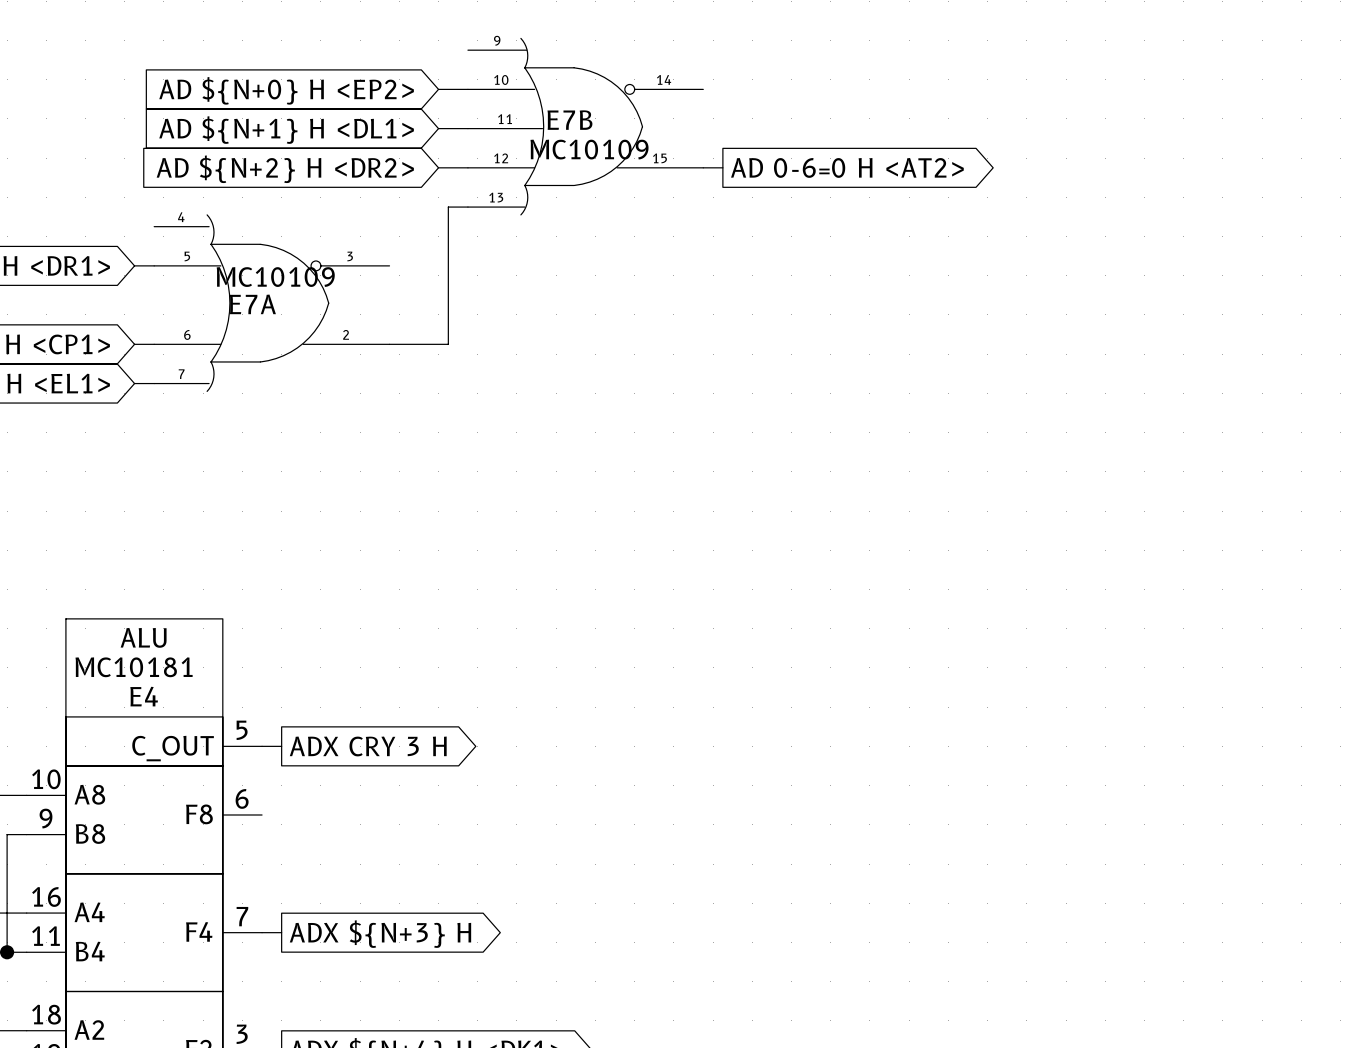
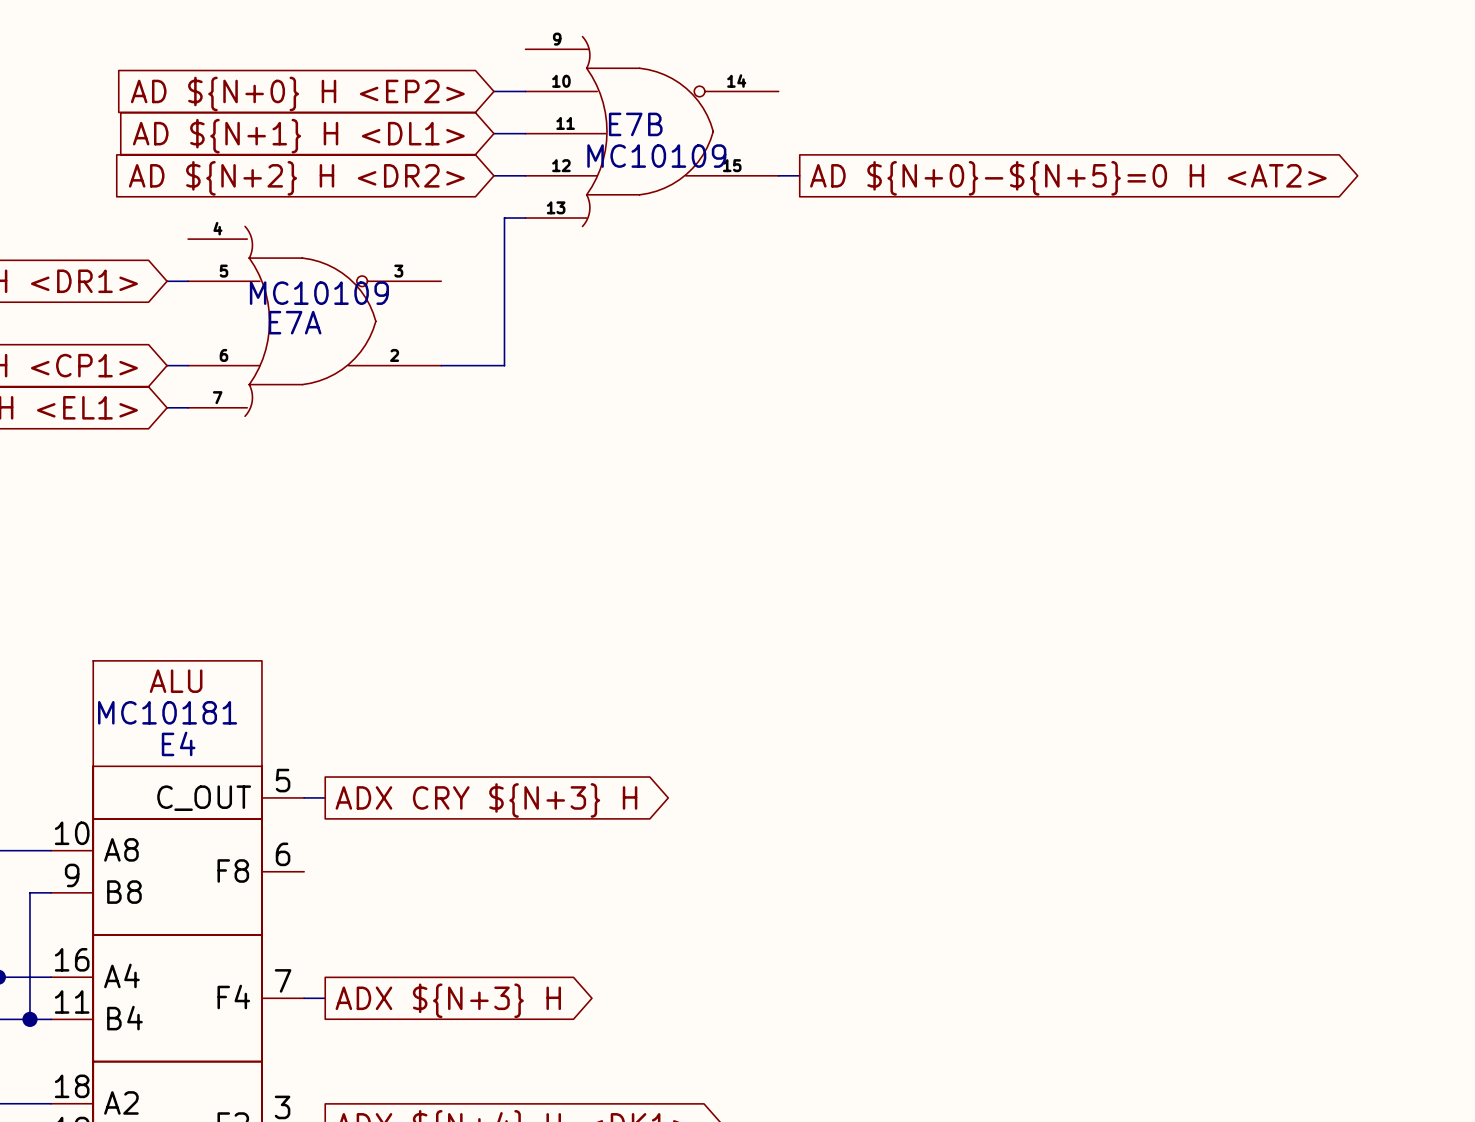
global label: AD 0-6=0 H <AT2> (847, 167) -> AD ${N+0}-${N+5}=0 H <AT2> (1068, 178)
global label: ADX CRY 3 H (368, 746) -> ADX CRY ${N+3} H (486, 800)

